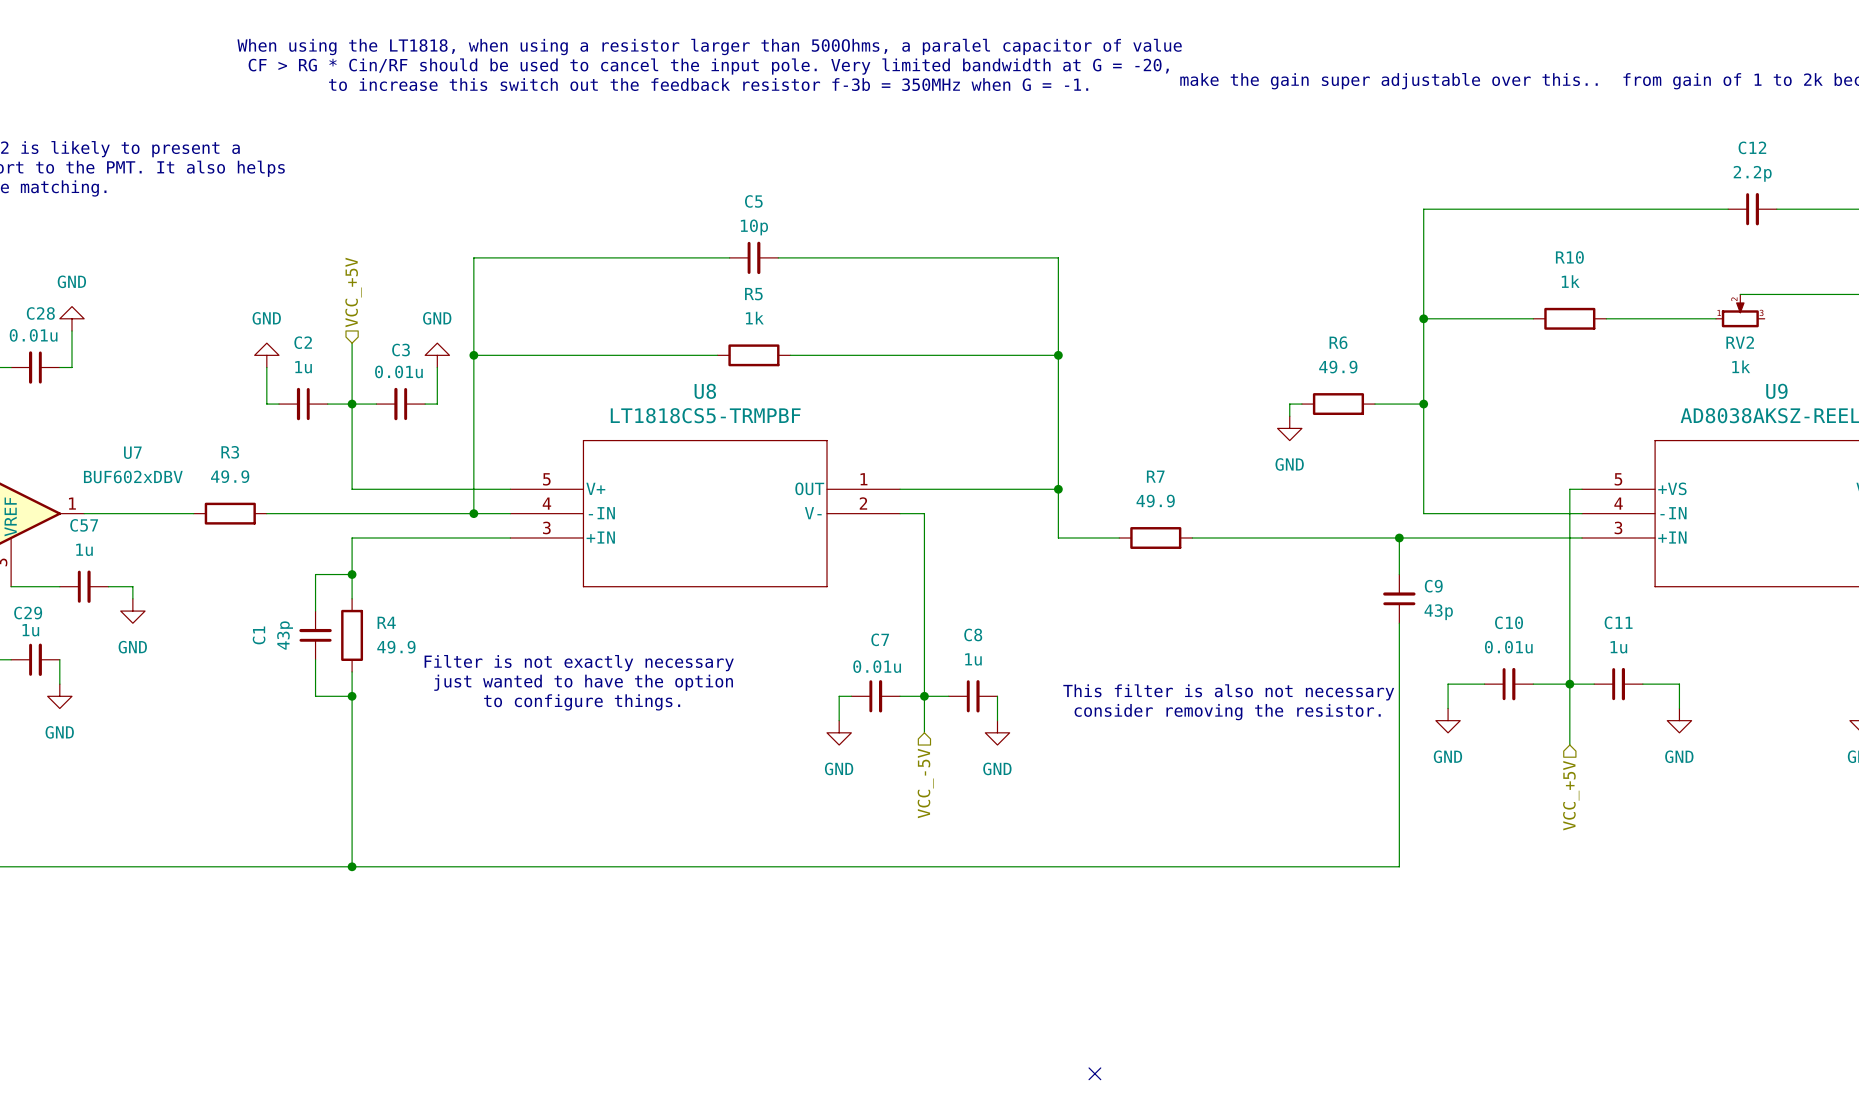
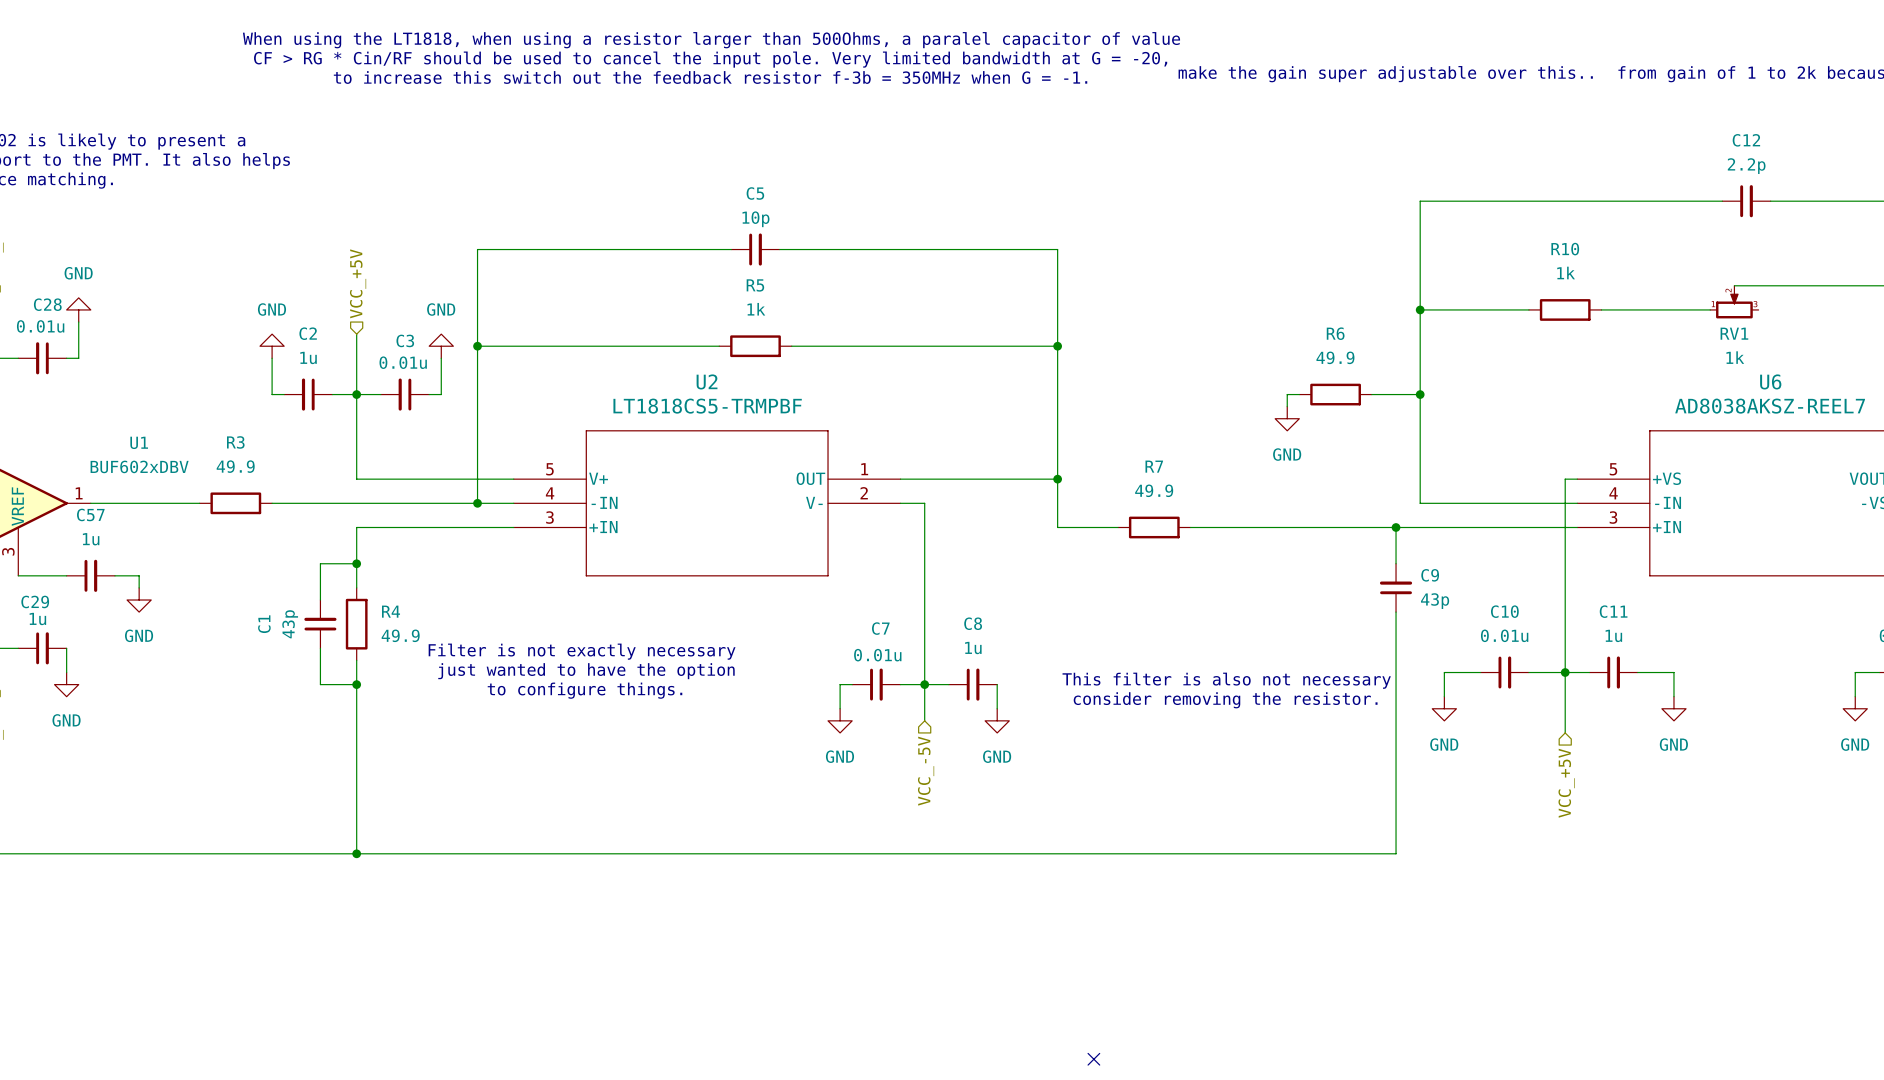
RV2 name: RV2 (1740, 342) -> RV1 (1734, 333)
U8 name: U8 (705, 391) -> U2 (707, 381)
U9 name: U9 (1776, 391) -> U6 (1770, 381)
U7 name: U7 (132, 452) -> U1 (139, 442)

